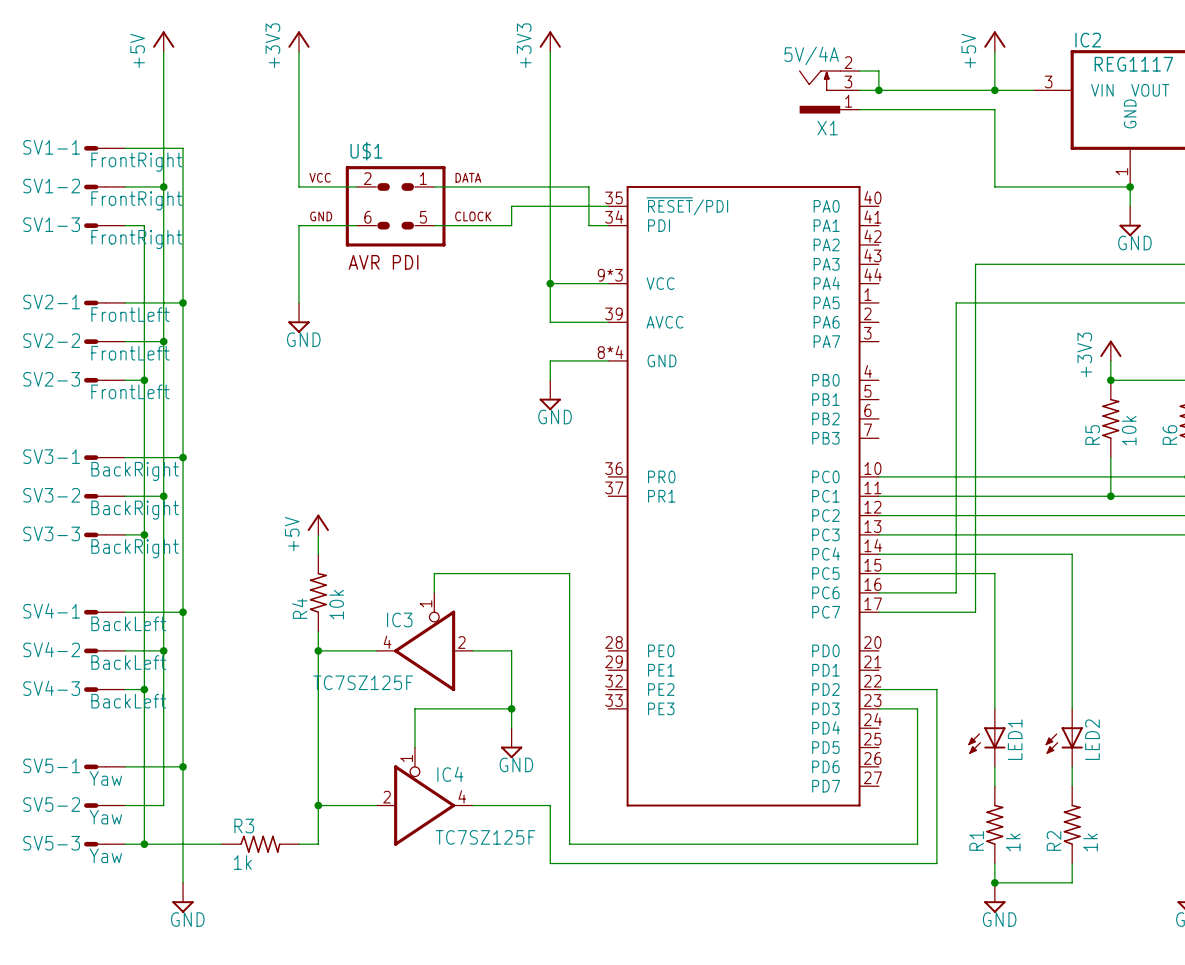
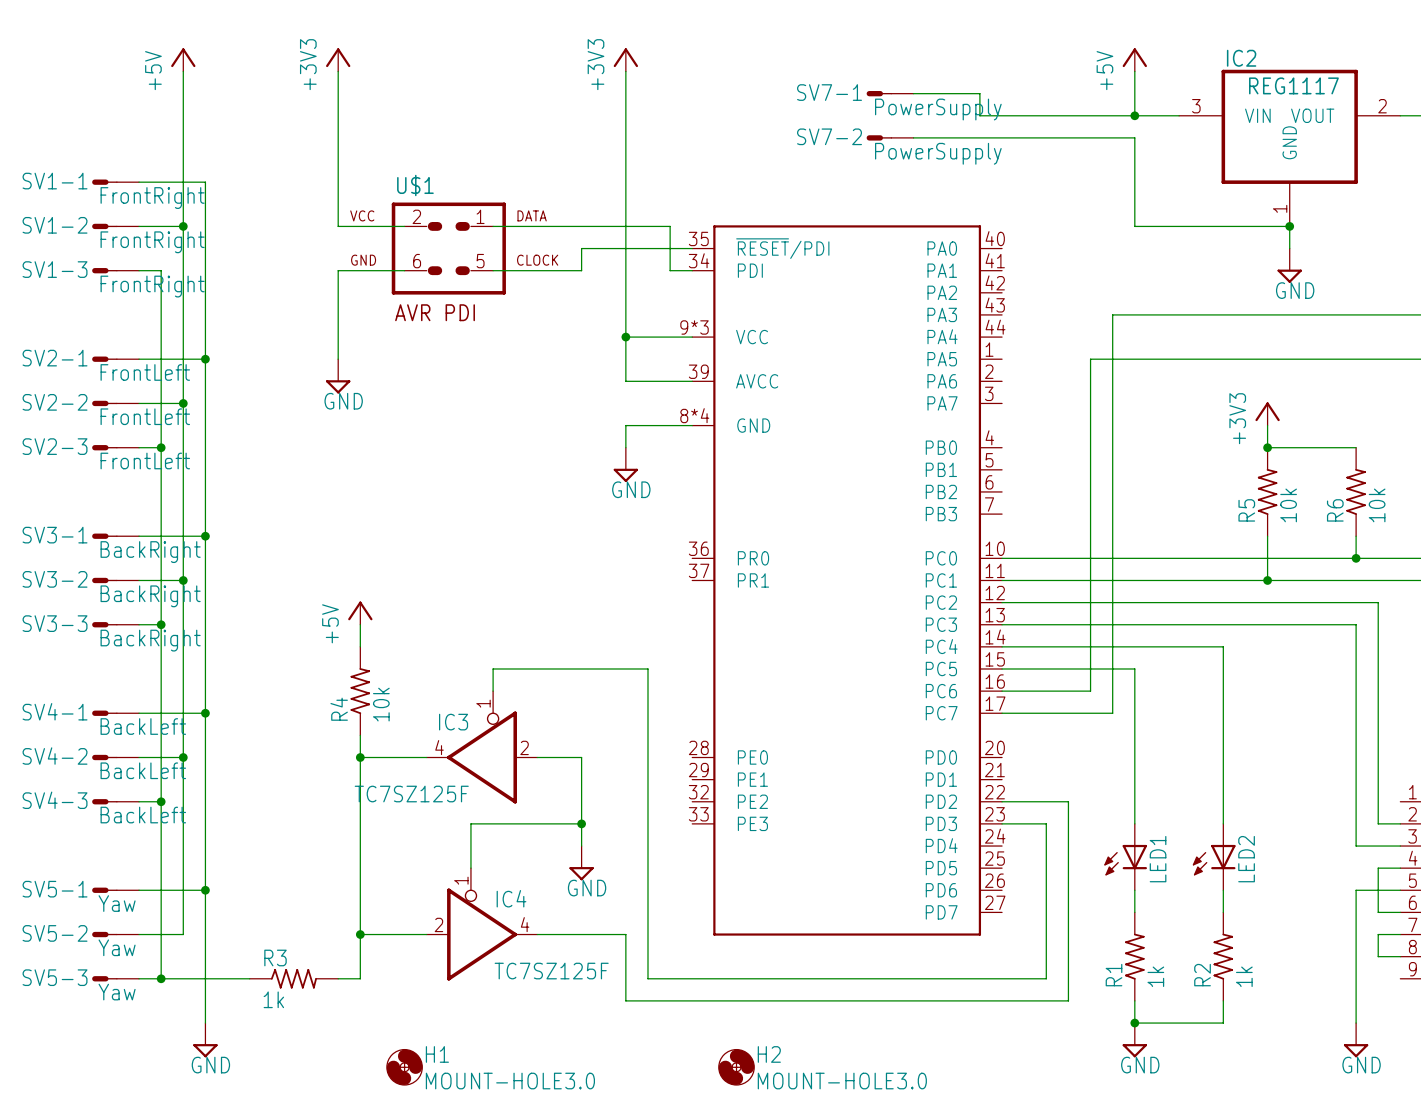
SV7-1: none -> PowerSupply (890, 93)
wire: none -> (913, 93) (979, 93) (979, 115)
wire: (859, 71) (878, 71) (878, 90) -> none
junction: (878, 90) -> none
X1: 5V/4A (829, 91) -> none
SV7-2: none -> PowerSupply (890, 137)
H1: none -> MOUNT-HOLE3.0 (404, 1067)
H2: none -> MOUNT-HOLE3.0 (736, 1067)

